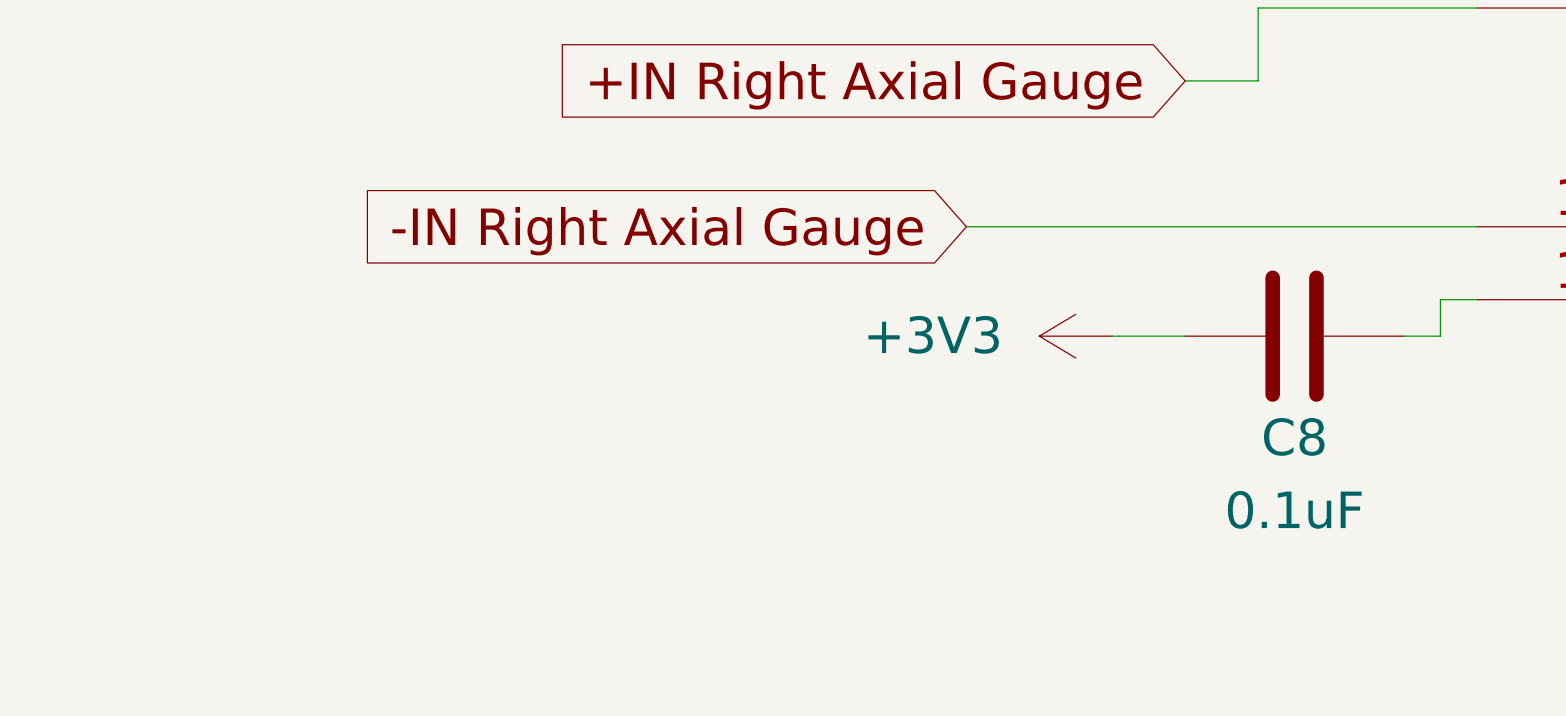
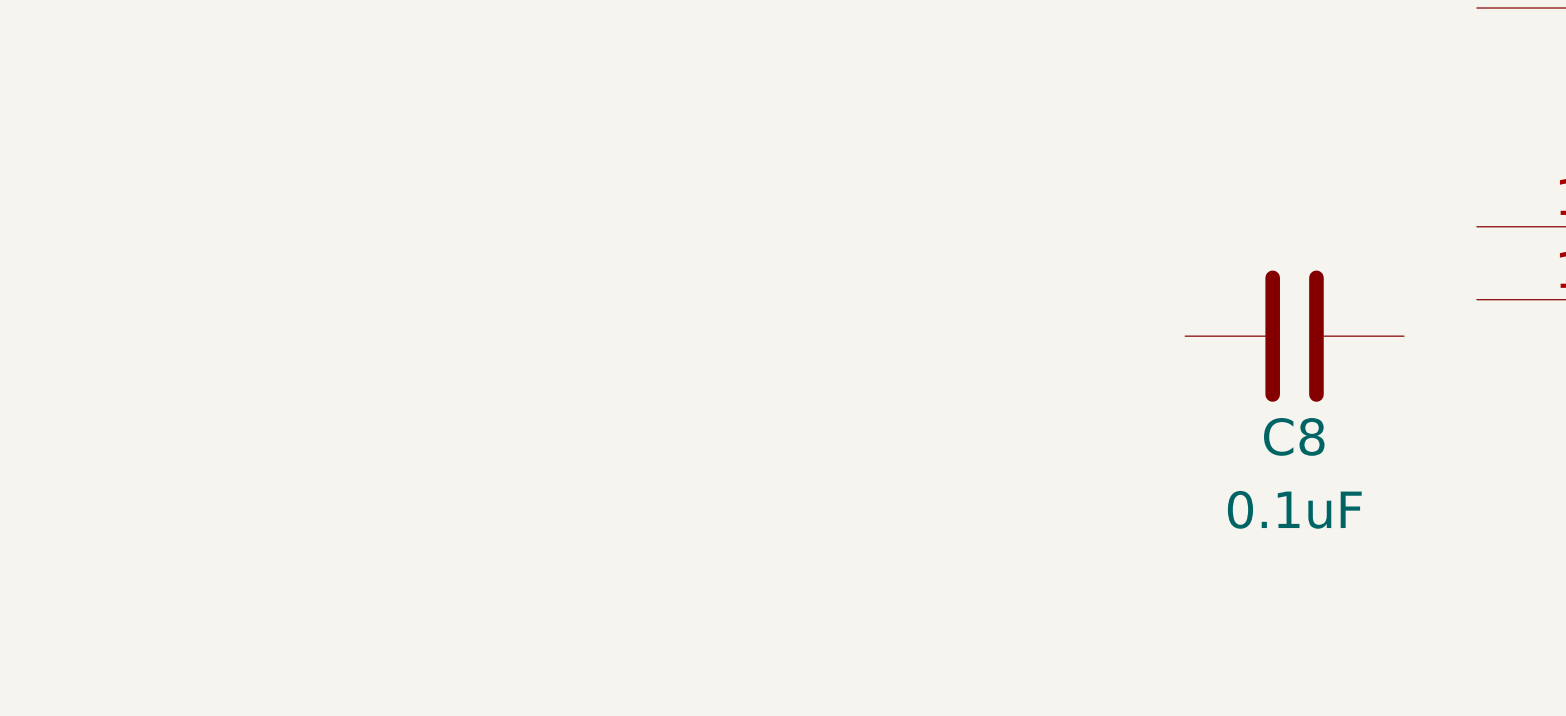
wire: (1476, 8) (1258, 8) (1258, 80) (1185, 80) -> none
global label: +IN Right Axial Gauge (865, 85) -> none
wire: (966, 226) (1476, 226) -> none
global label: -IN Right Axial Gauge (657, 231) -> none
wire: (1476, 299) (1440, 299) (1440, 336) (1403, 336) -> none
power symbol: +3V3 (1075, 336) -> none
wire: (1112, 336) (1185, 336) -> none

